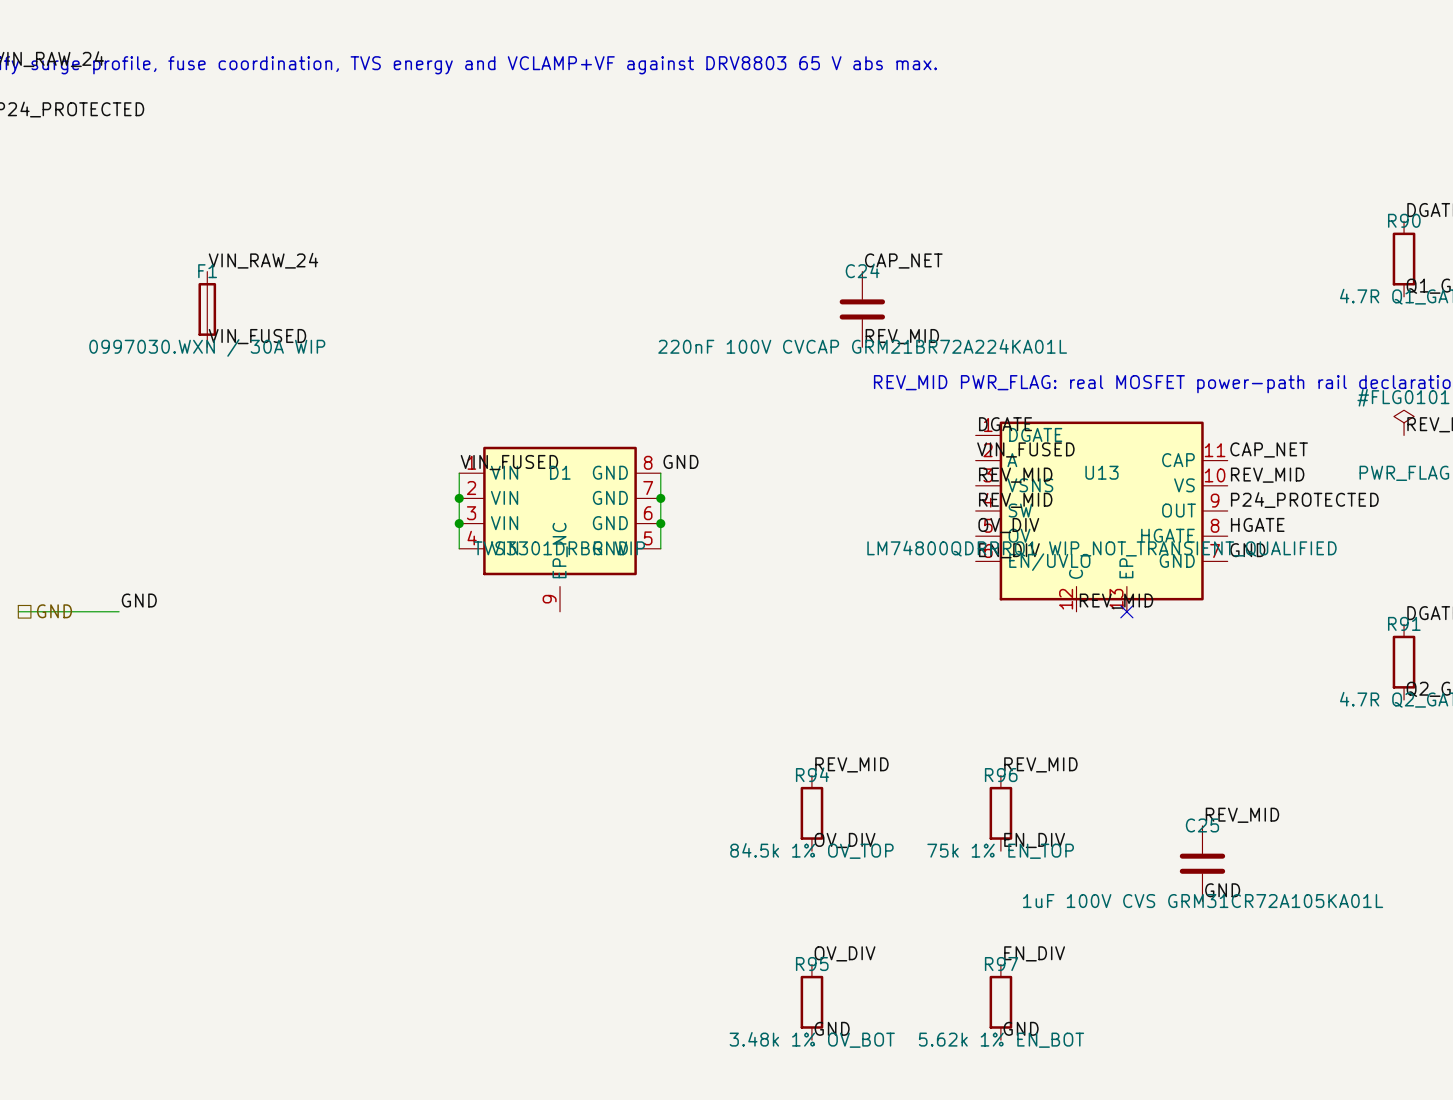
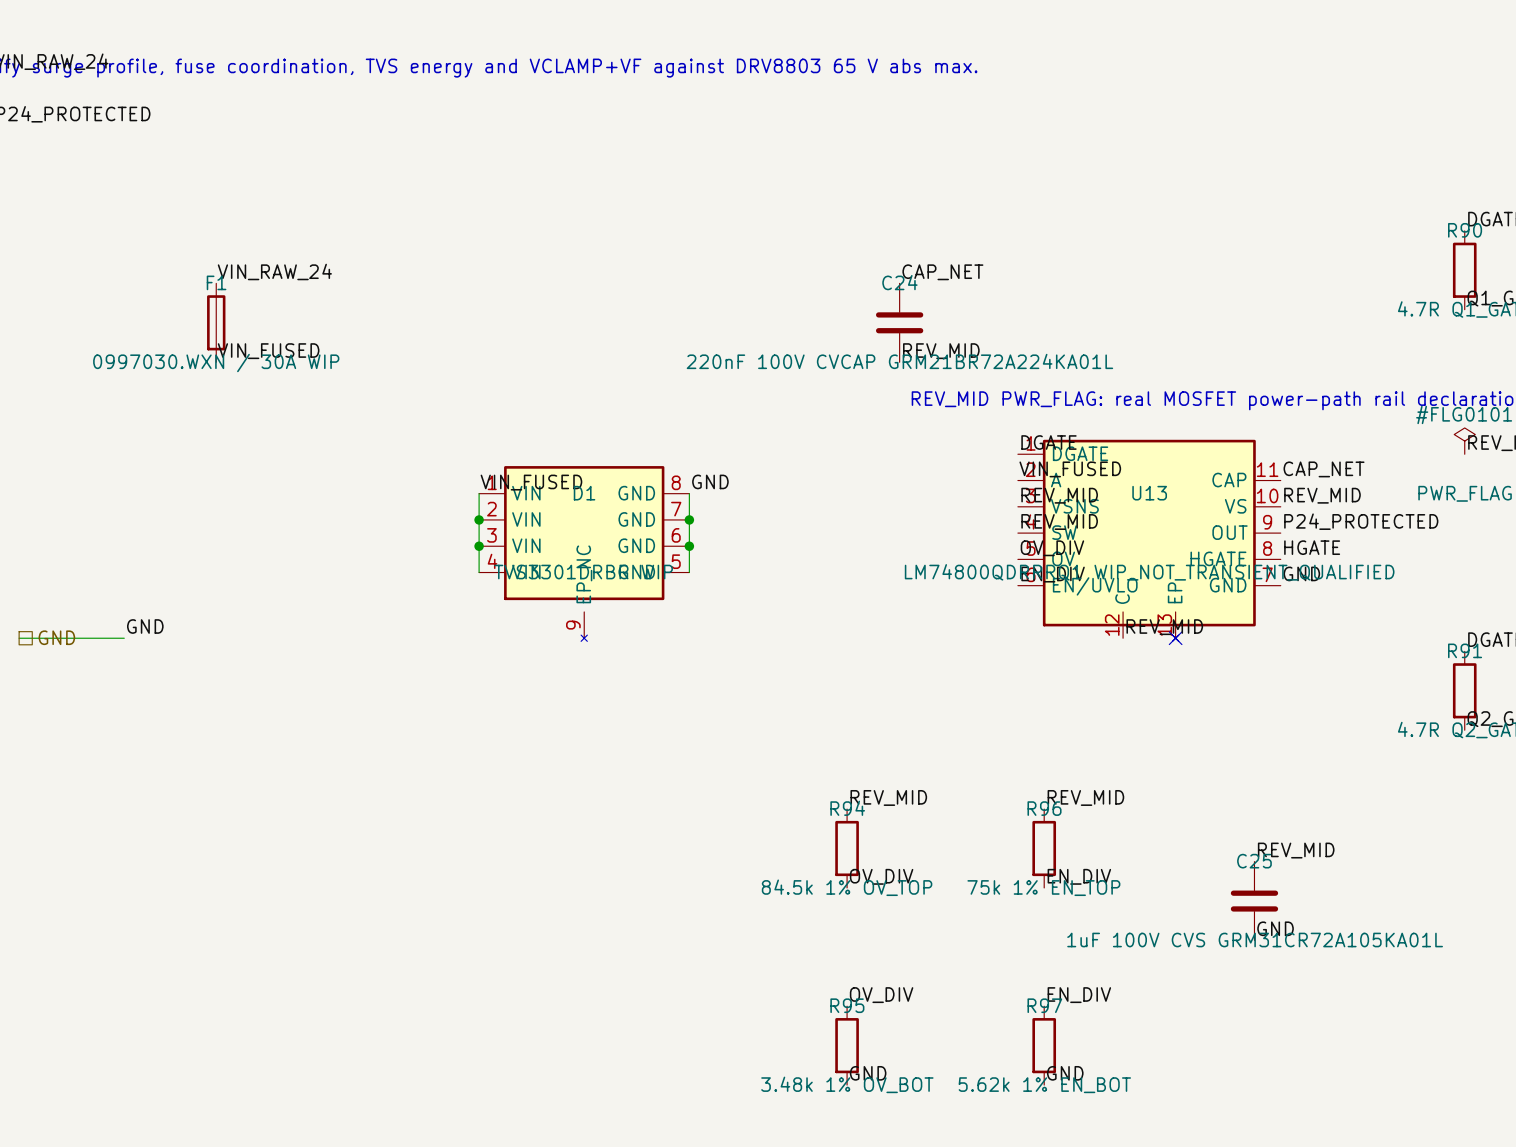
U13 symbol: [975, 421, 1228, 612] -> [1017, 439, 1281, 642]
D1 symbol: [459, 446, 661, 612] -> [479, 466, 690, 642]

